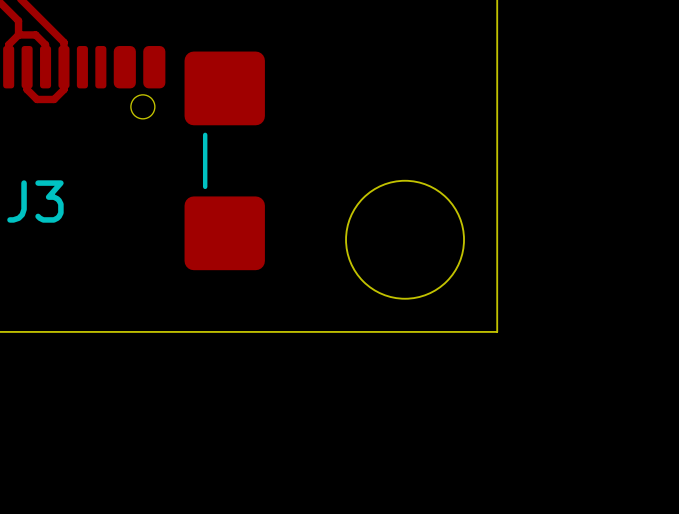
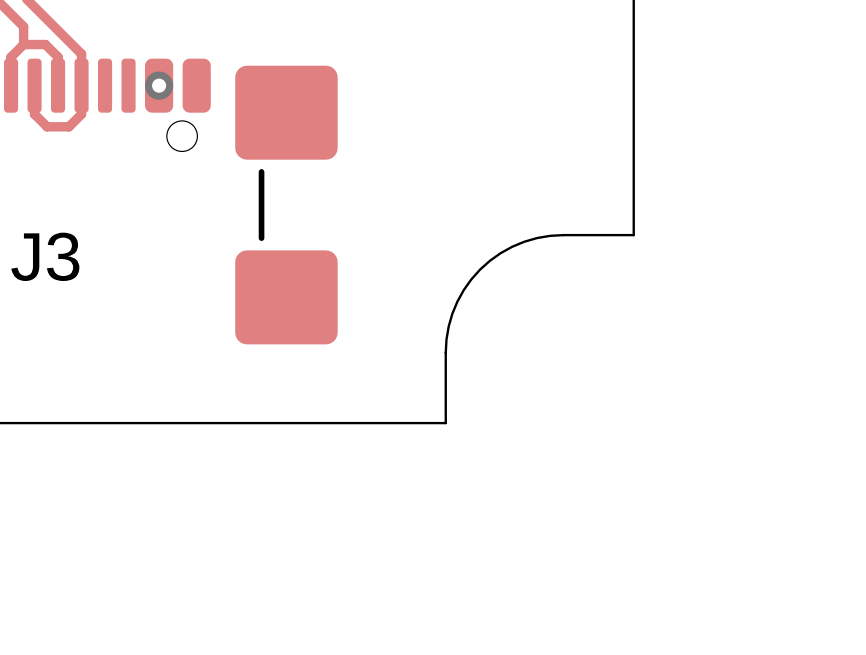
via: none -> (159, 85)
round board edge: [345, 179, 465, 300] -> none
board edge: (497, 184) (497, 331) (349, 331) -> (633, 235) (563, 235) (537, 238) (512, 246) (480, 269) (463, 290) (448, 326) (445, 352) (445, 423)

